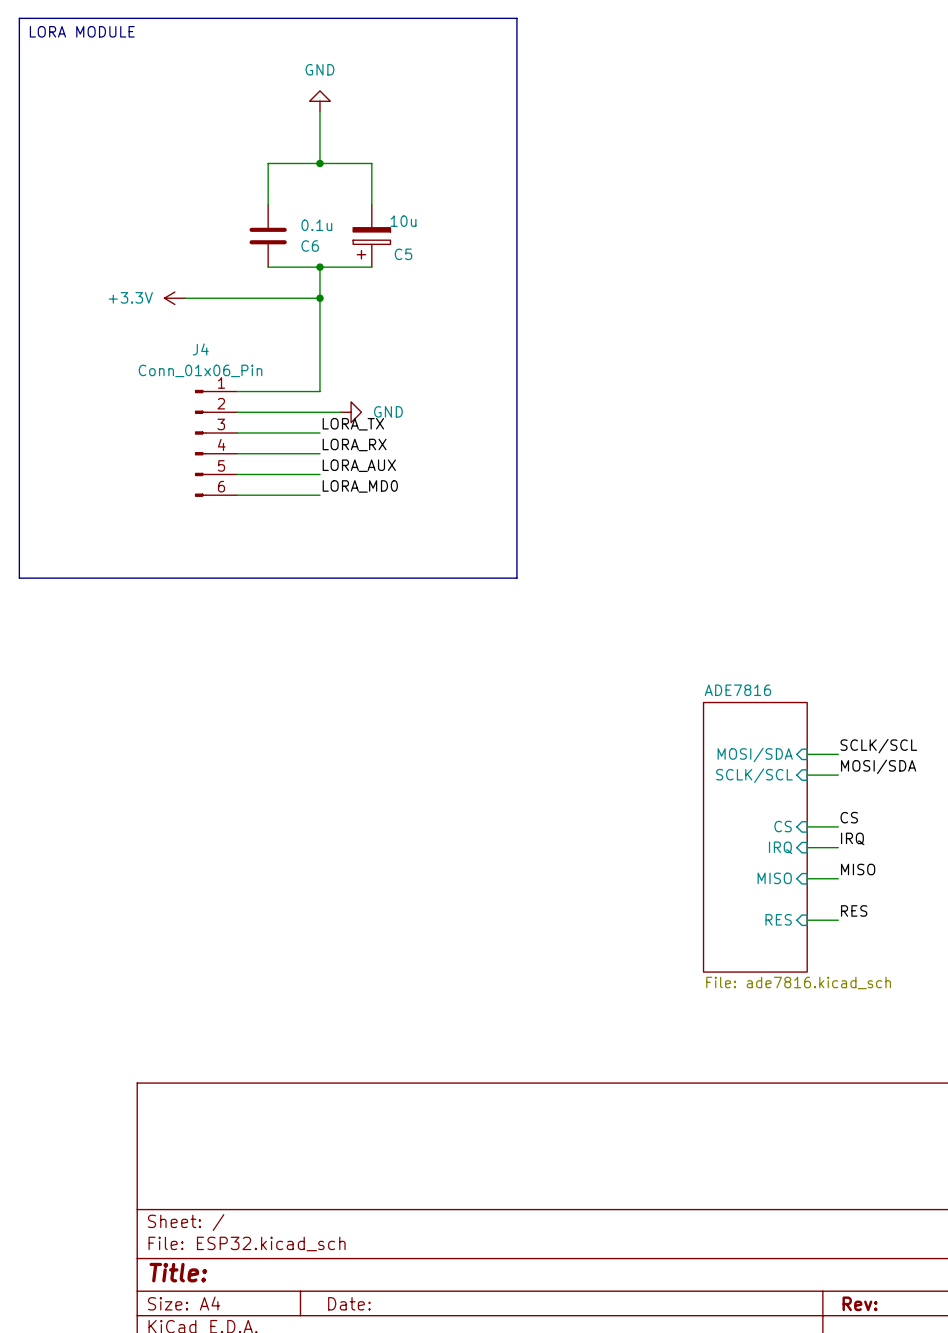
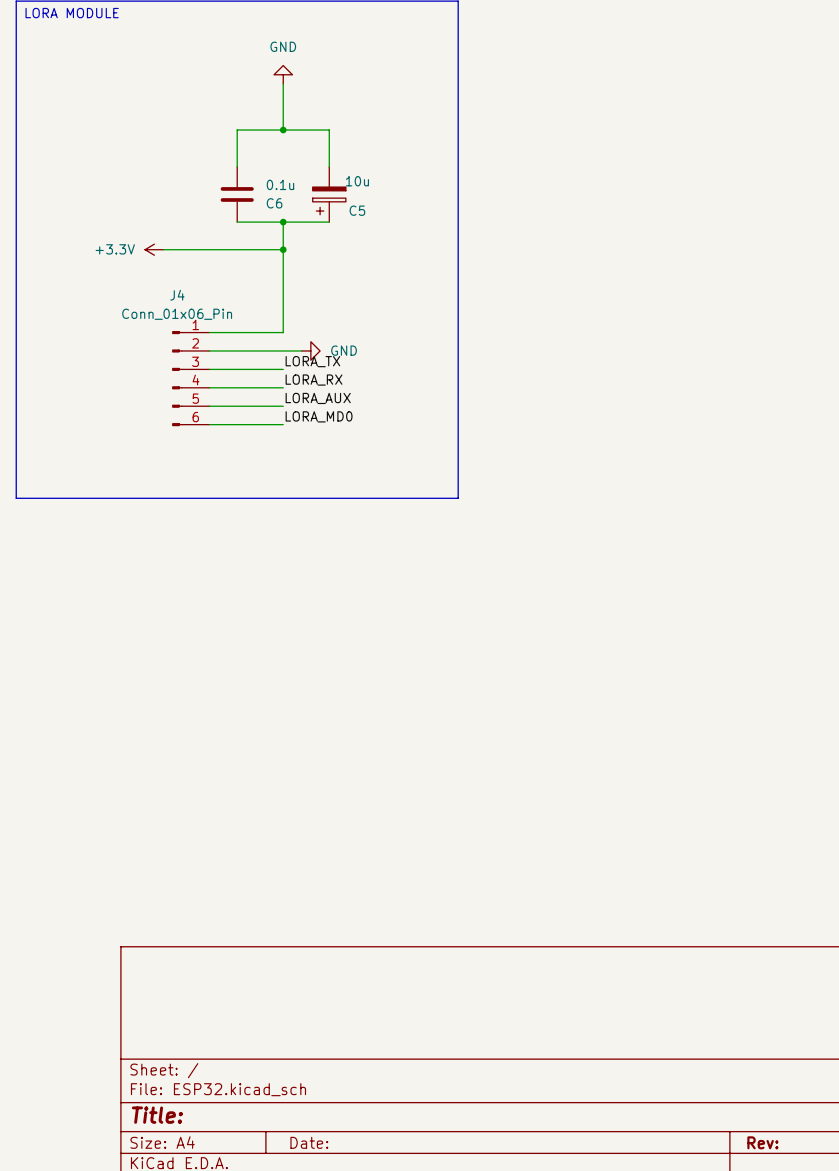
label: SCLK/SCL (878, 746) -> none
sheet pin: MOSI/SDA (755, 754) -> none
wire: (807, 754) (838, 754) -> none
label: MOSI/SDA (878, 766) -> none
sheet pin: SCLK/SCL (754, 775) -> none
wire: (807, 775) (838, 775) -> none
label: CS (849, 817) -> none
sheet pin: CS (783, 826) -> none
wire: (807, 826) (838, 826) -> none
sheet ADE7816: File: ade7816.kicad_sch (755, 837) -> none
label: IRQ (852, 838) -> none
sheet pin: IRQ (780, 847) -> none
wire: (807, 847) (838, 847) -> none
label: MISO (858, 869) -> none
sheet pin: MISO (774, 878) -> none
wire: (807, 878) (838, 878) -> none
label: RES (854, 910) -> none
sheet pin: RES (778, 919) -> none
wire: (807, 920) (838, 920) -> none

